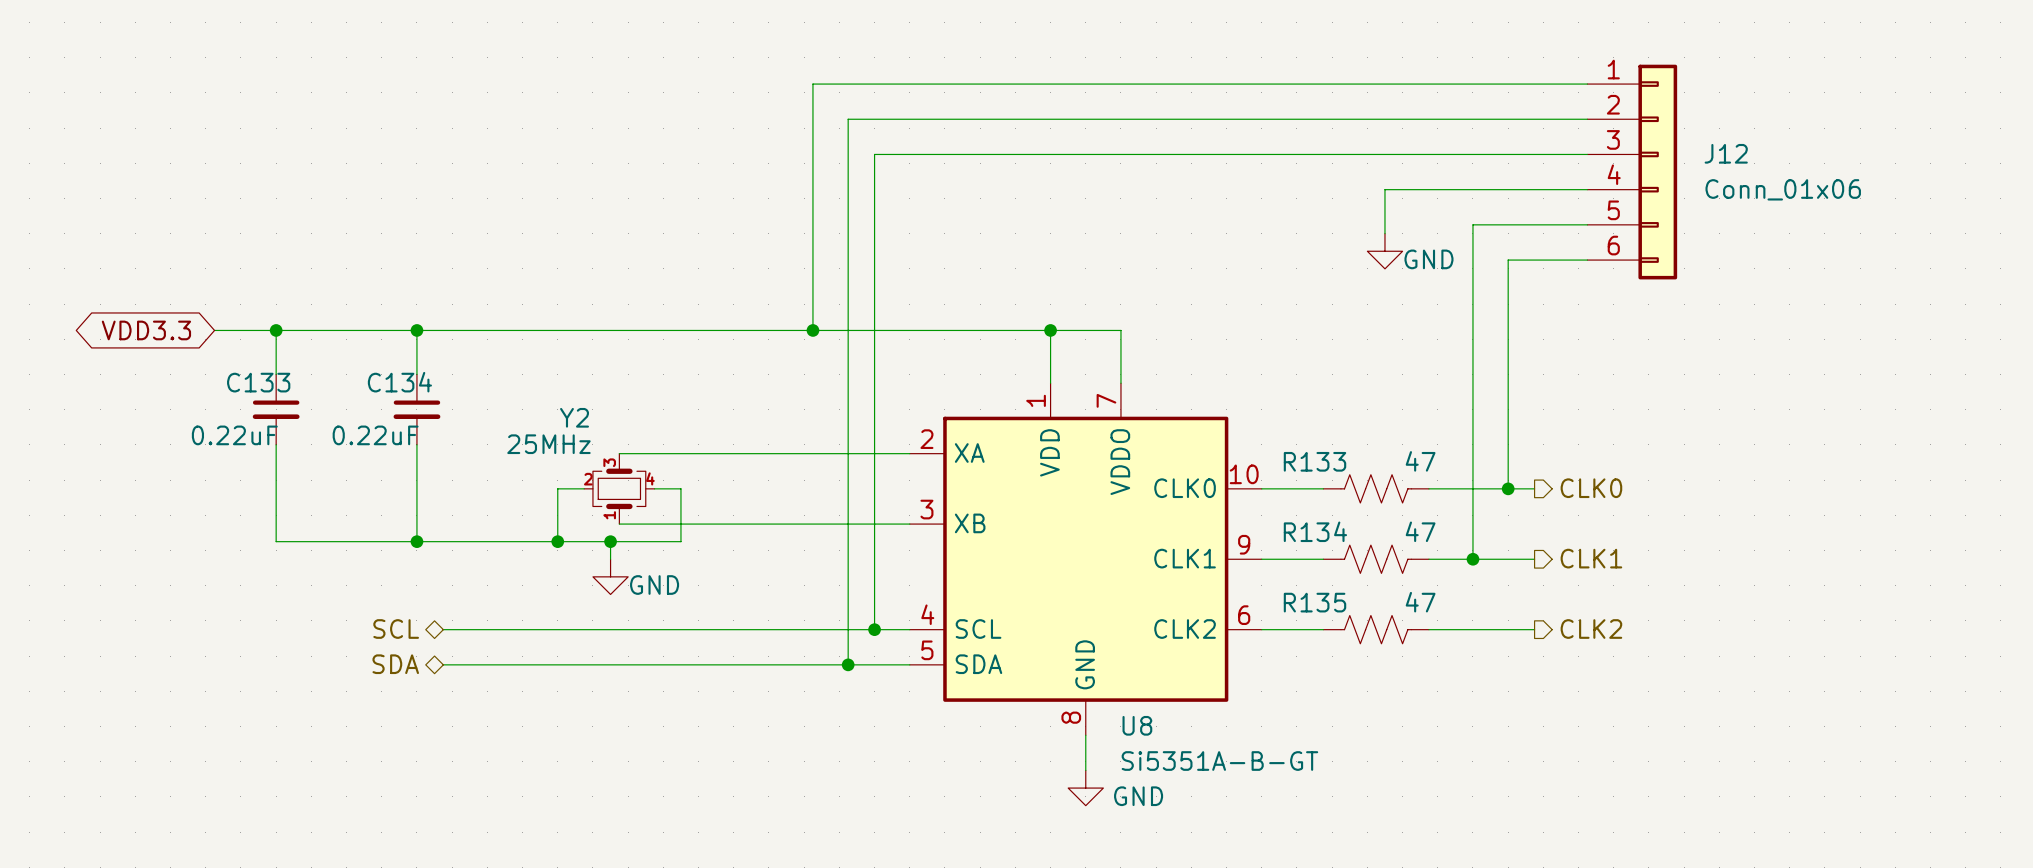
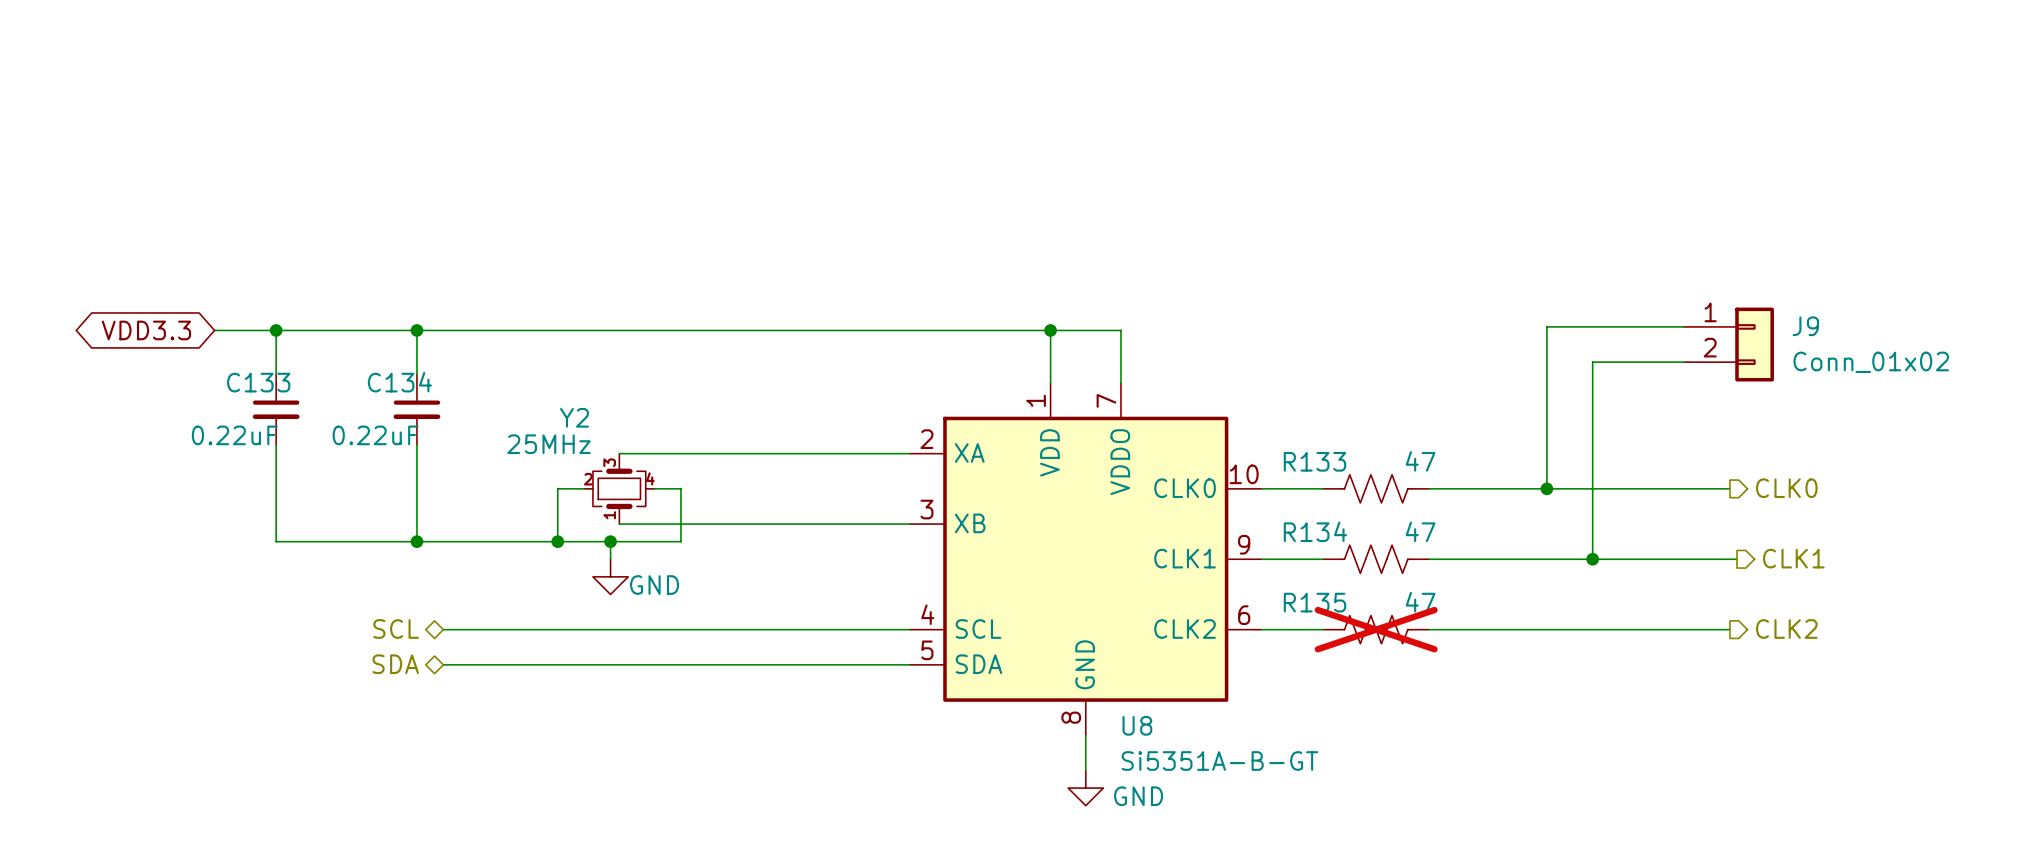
wire: (1587, 84) (812, 84) (812, 330) -> none
wire: (1587, 119) (848, 119) (848, 664) -> none
wire: (1587, 154) (874, 154) (874, 629) -> none
J12: Conn_01x06 (1632, 172) -> none
wire: (1587, 189) (1384, 189) (1384, 233) -> none
wire: (1587, 224) (1472, 224) (1472, 559) -> none
power symbol: GND (1384, 251) -> none
wire: (1587, 260) (1508, 260) (1508, 488) -> none
wire: none -> (1684, 326) (1546, 326) (1546, 488)
junction: (812, 330) -> none
J9: none -> Conn_01x02 (1729, 344)
wire: none -> (1684, 362) (1592, 362) (1592, 559)
junction position: (1508, 488) -> (1546, 488)
wire: none -> (1534, 488) (1729, 488)
hierarchical label position: CLK0 (1591, 488) -> CLK0 (1786, 488)
hierarchical label position: CLK1 (1591, 558) -> CLK1 (1793, 558)
junction: (1472, 559) -> none
wire: none -> (1534, 559) (1736, 559)
junction: none -> (1592, 559)
junction: (874, 629) -> none
R135 do-not-place cross: none -> (1376, 629)
wire: none -> (1534, 629) (1729, 629)
hierarchical label position: CLK2 (1591, 629) -> CLK2 (1786, 629)
junction: (848, 664) -> none

